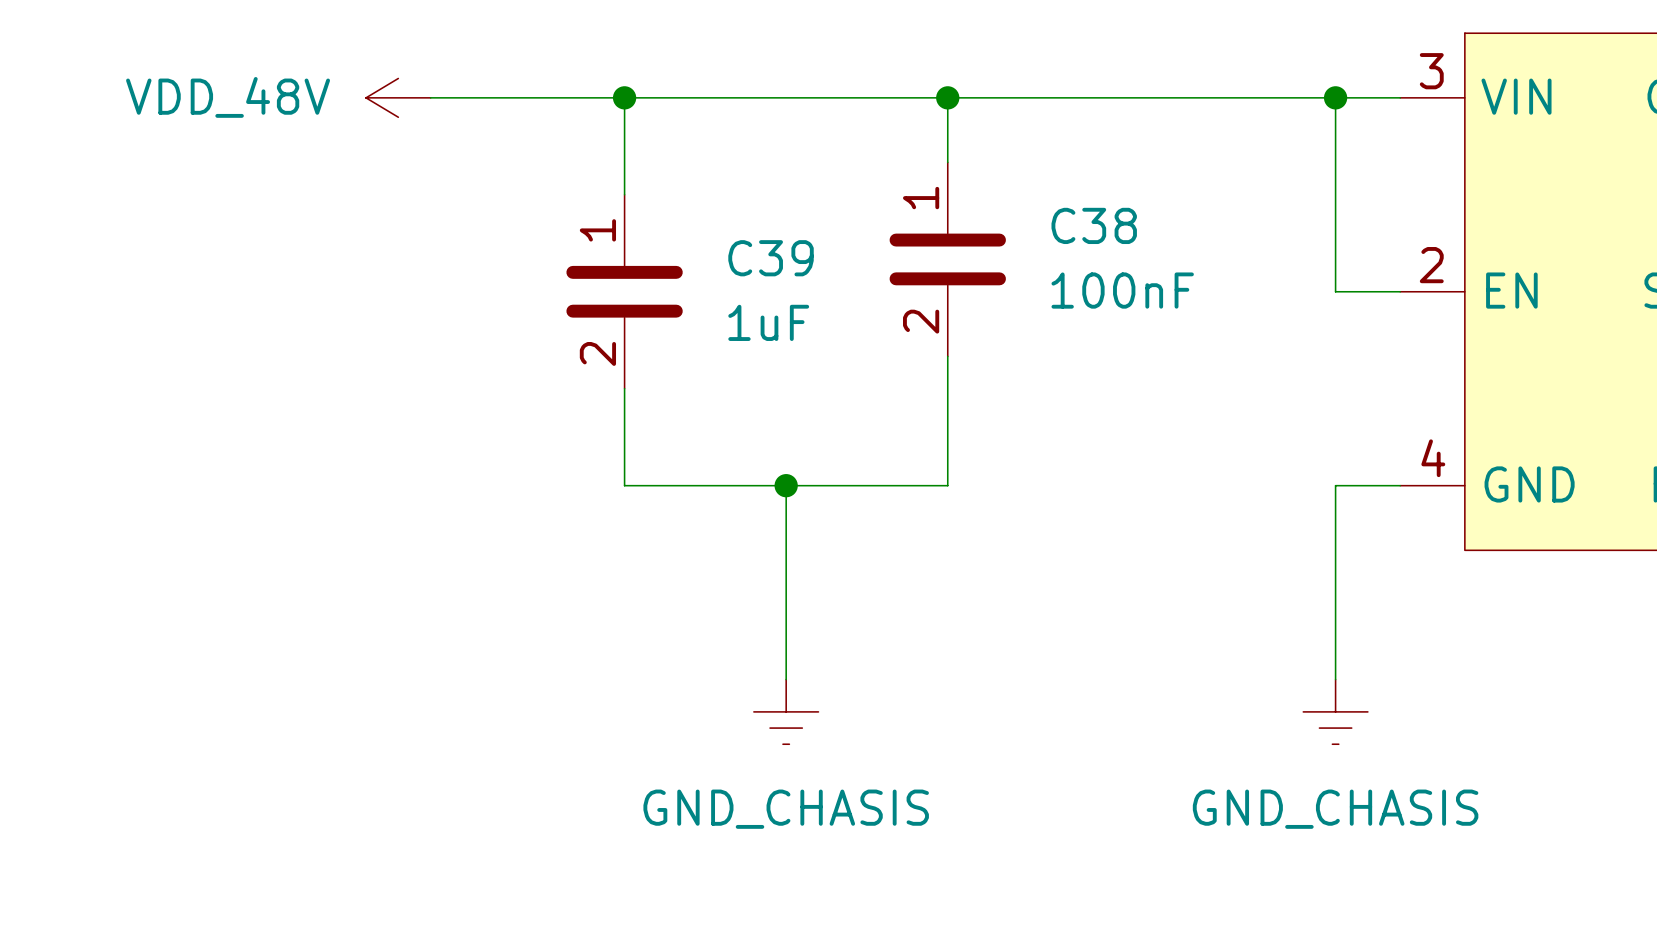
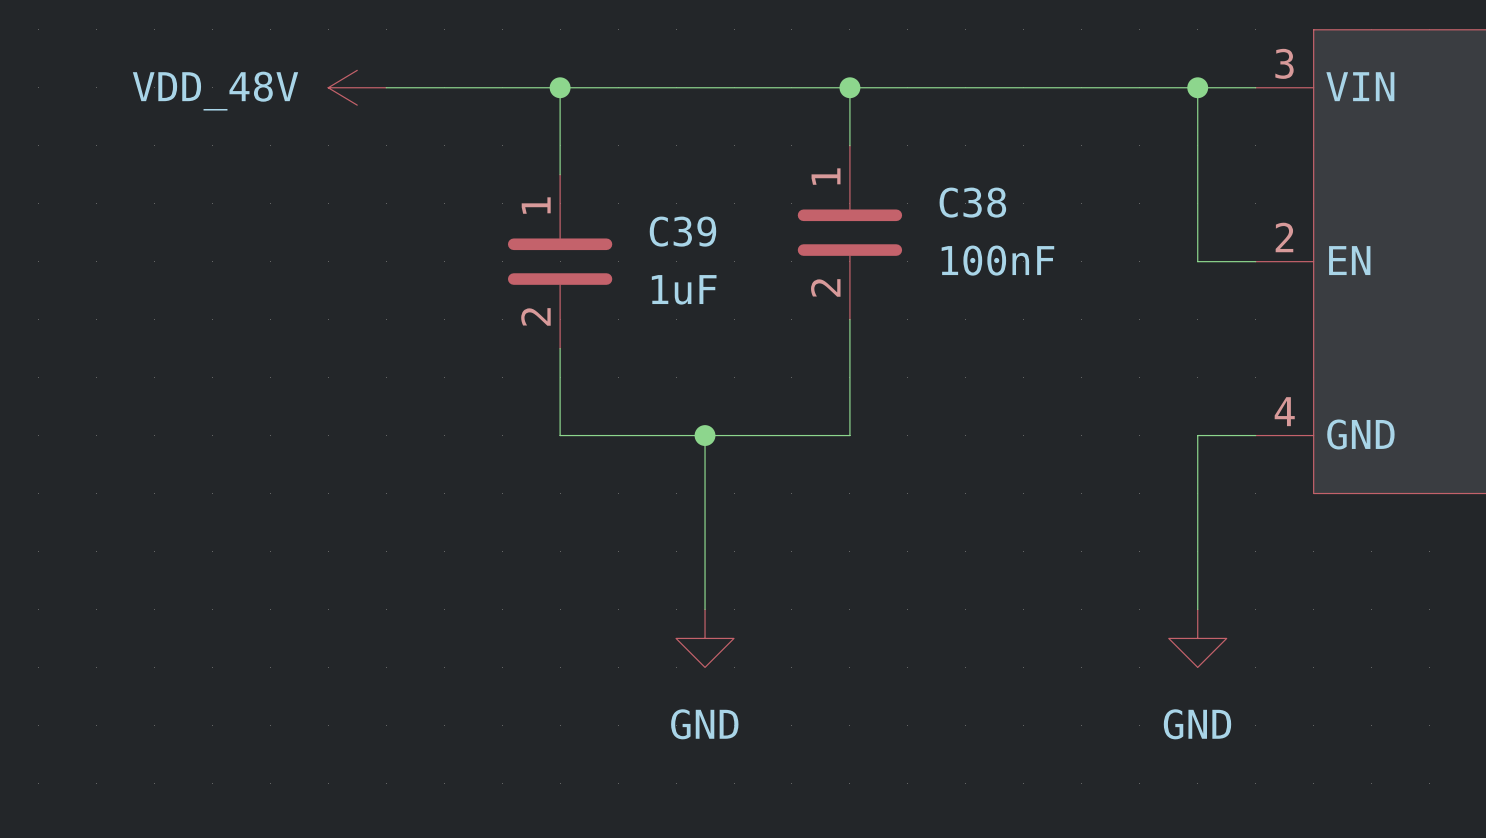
power symbol: GND_CHASIS (786, 711) -> GND (705, 638)
power symbol: GND_CHASIS (1335, 711) -> GND (1197, 638)

